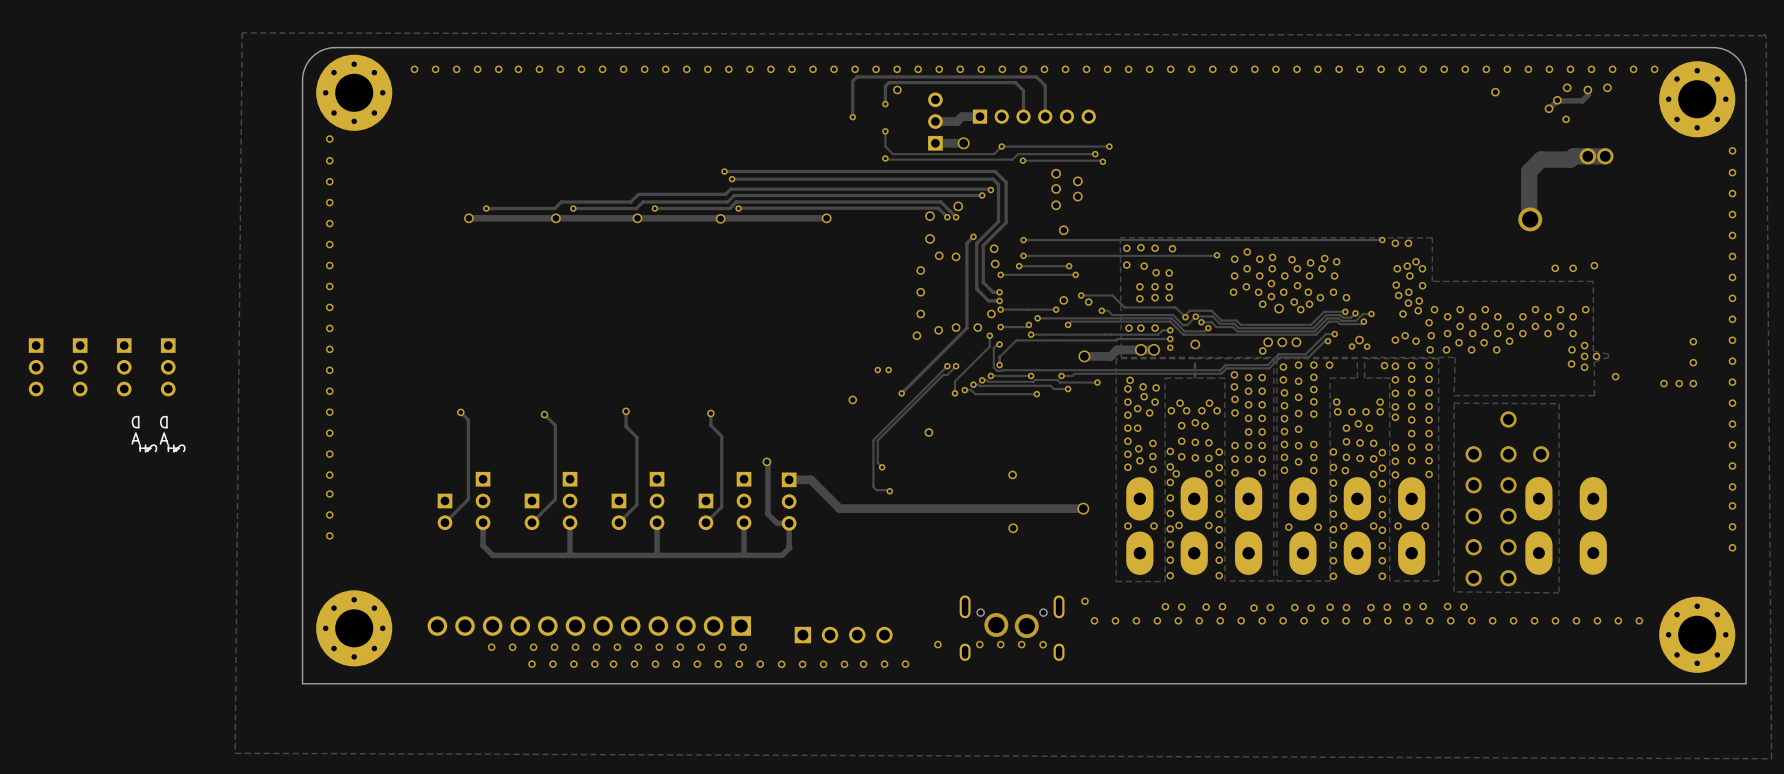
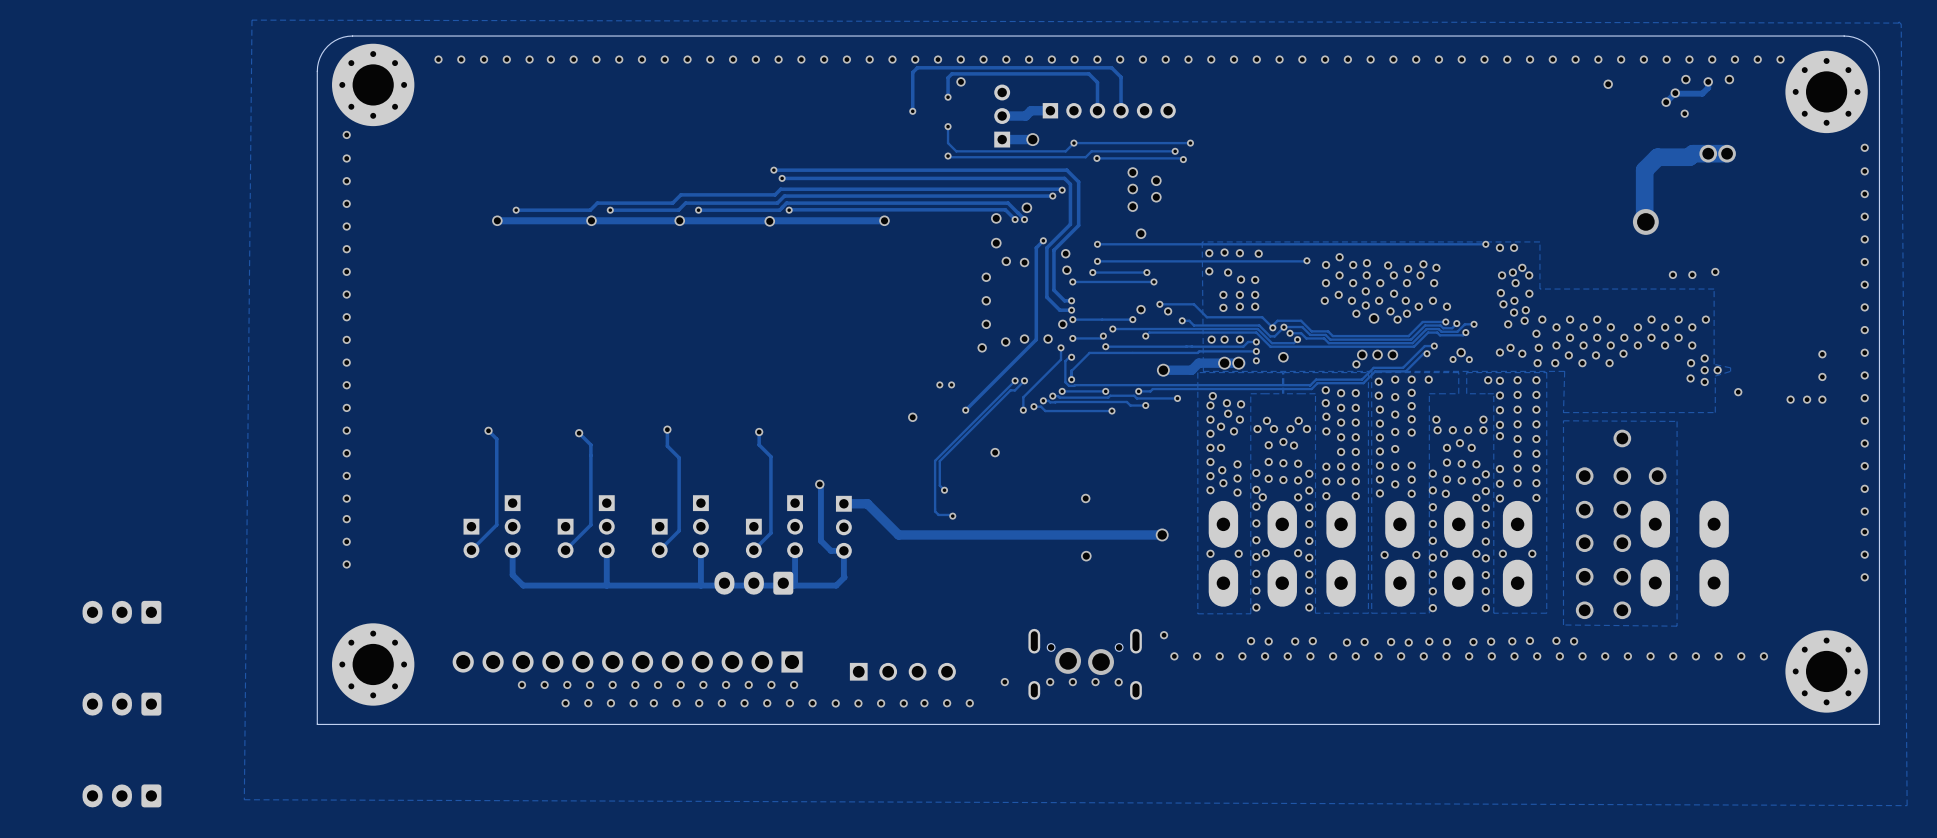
part: (36, 367) -> none
part: (80, 367) -> none
part: (124, 367) -> none
part: (168, 367) -> none
part: (144, 434) -> none
part: (172, 434) -> none
part: none -> (753, 583)
part: none -> (121, 612)
part: none -> (121, 704)
part: none -> (121, 795)

